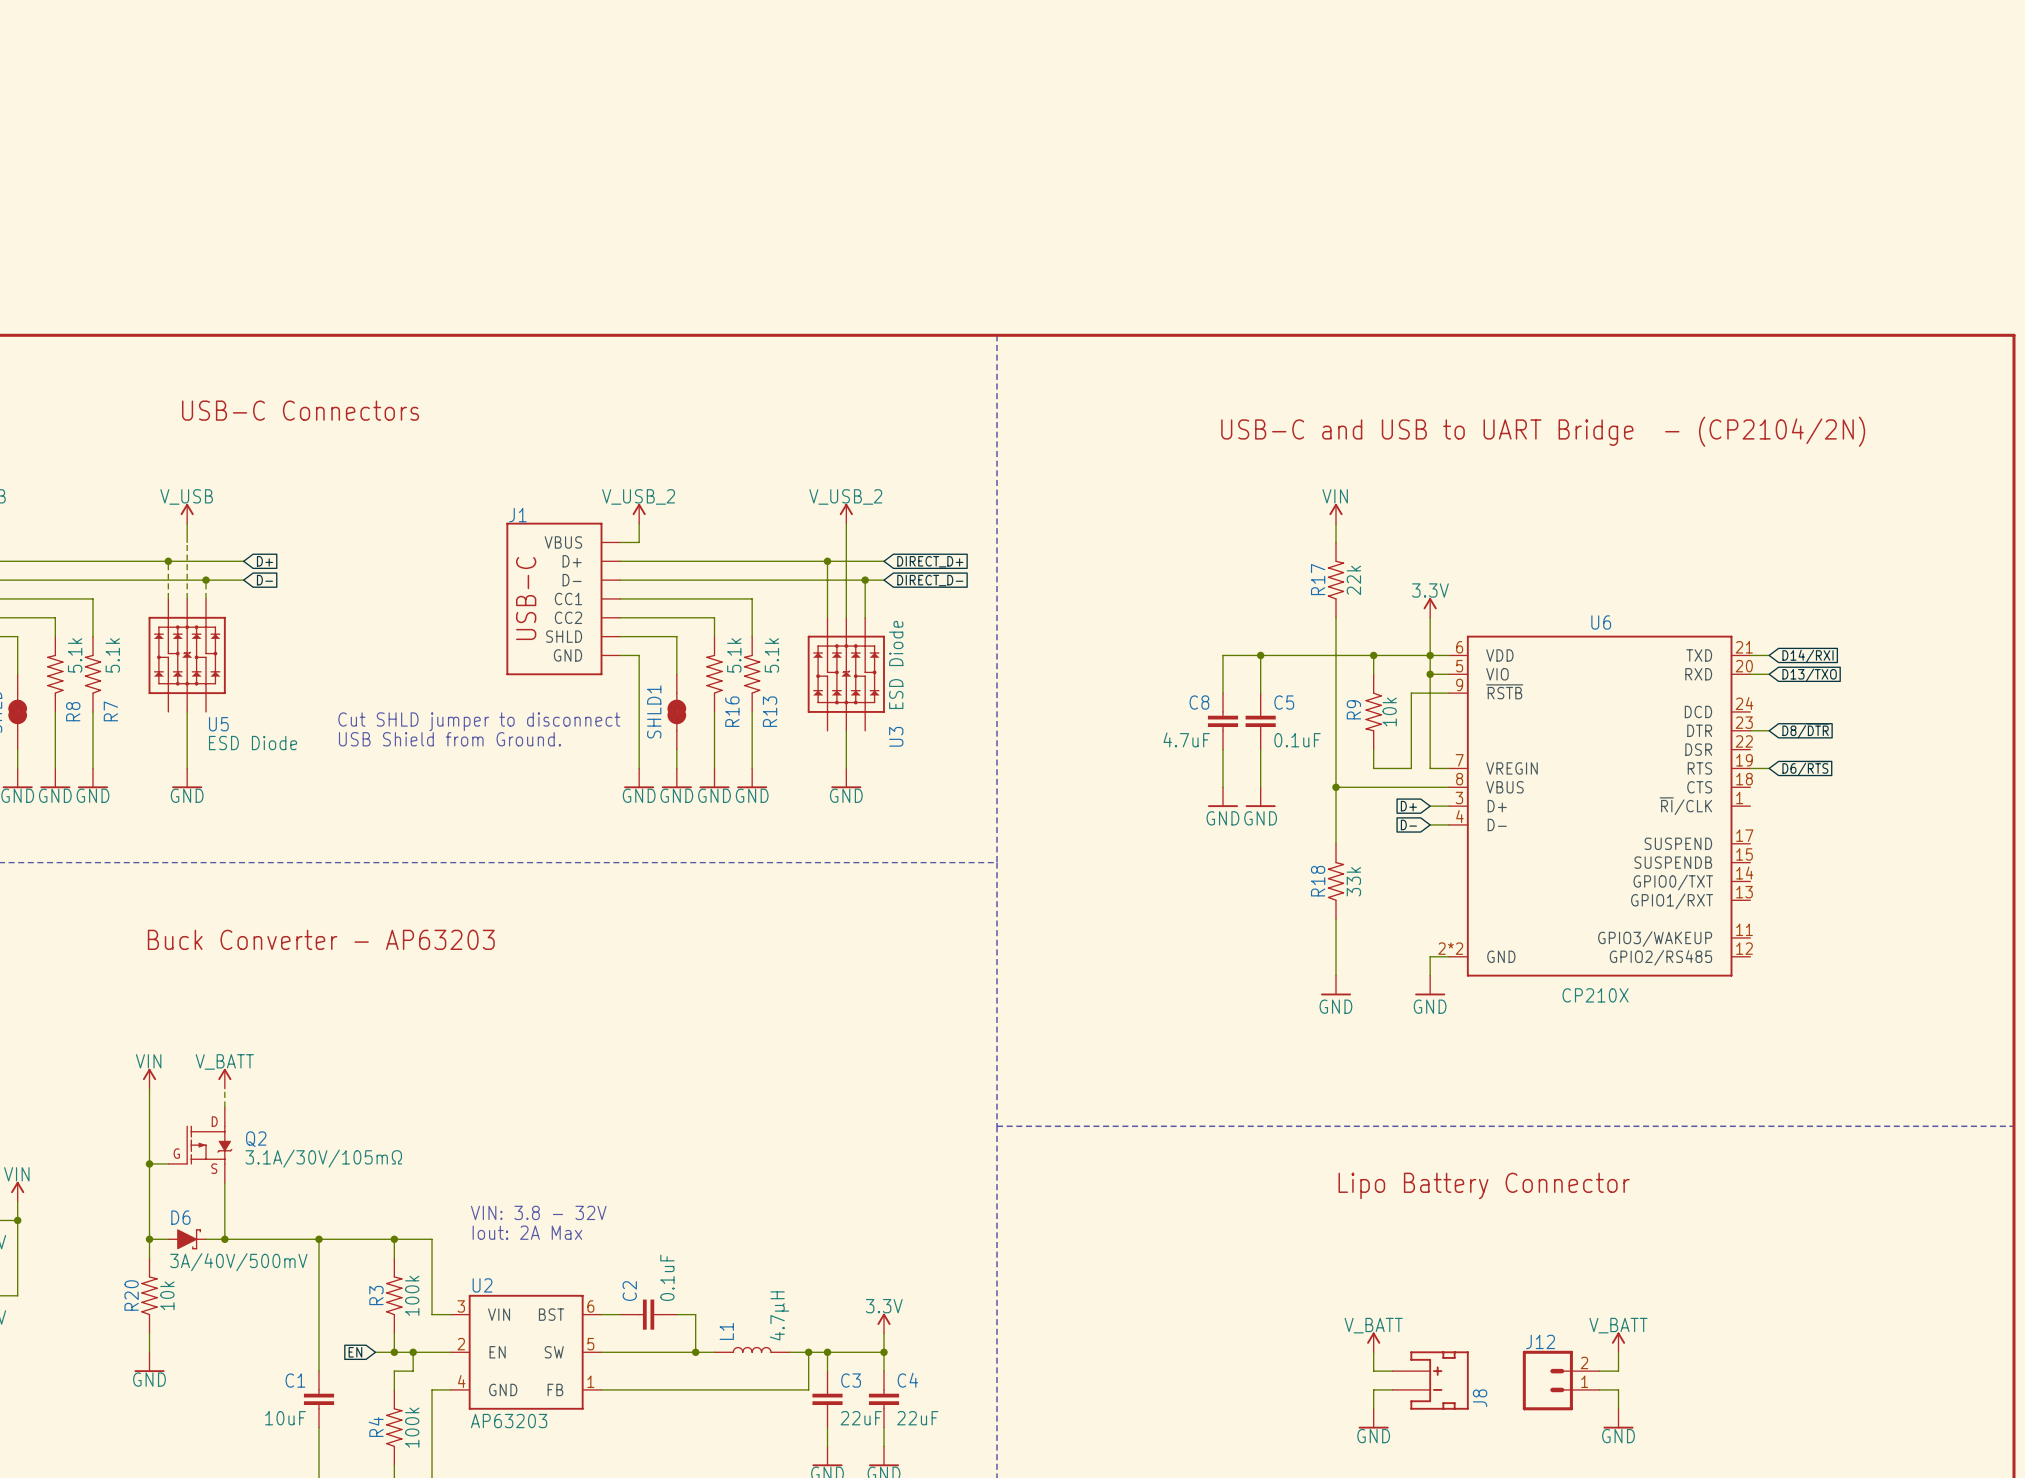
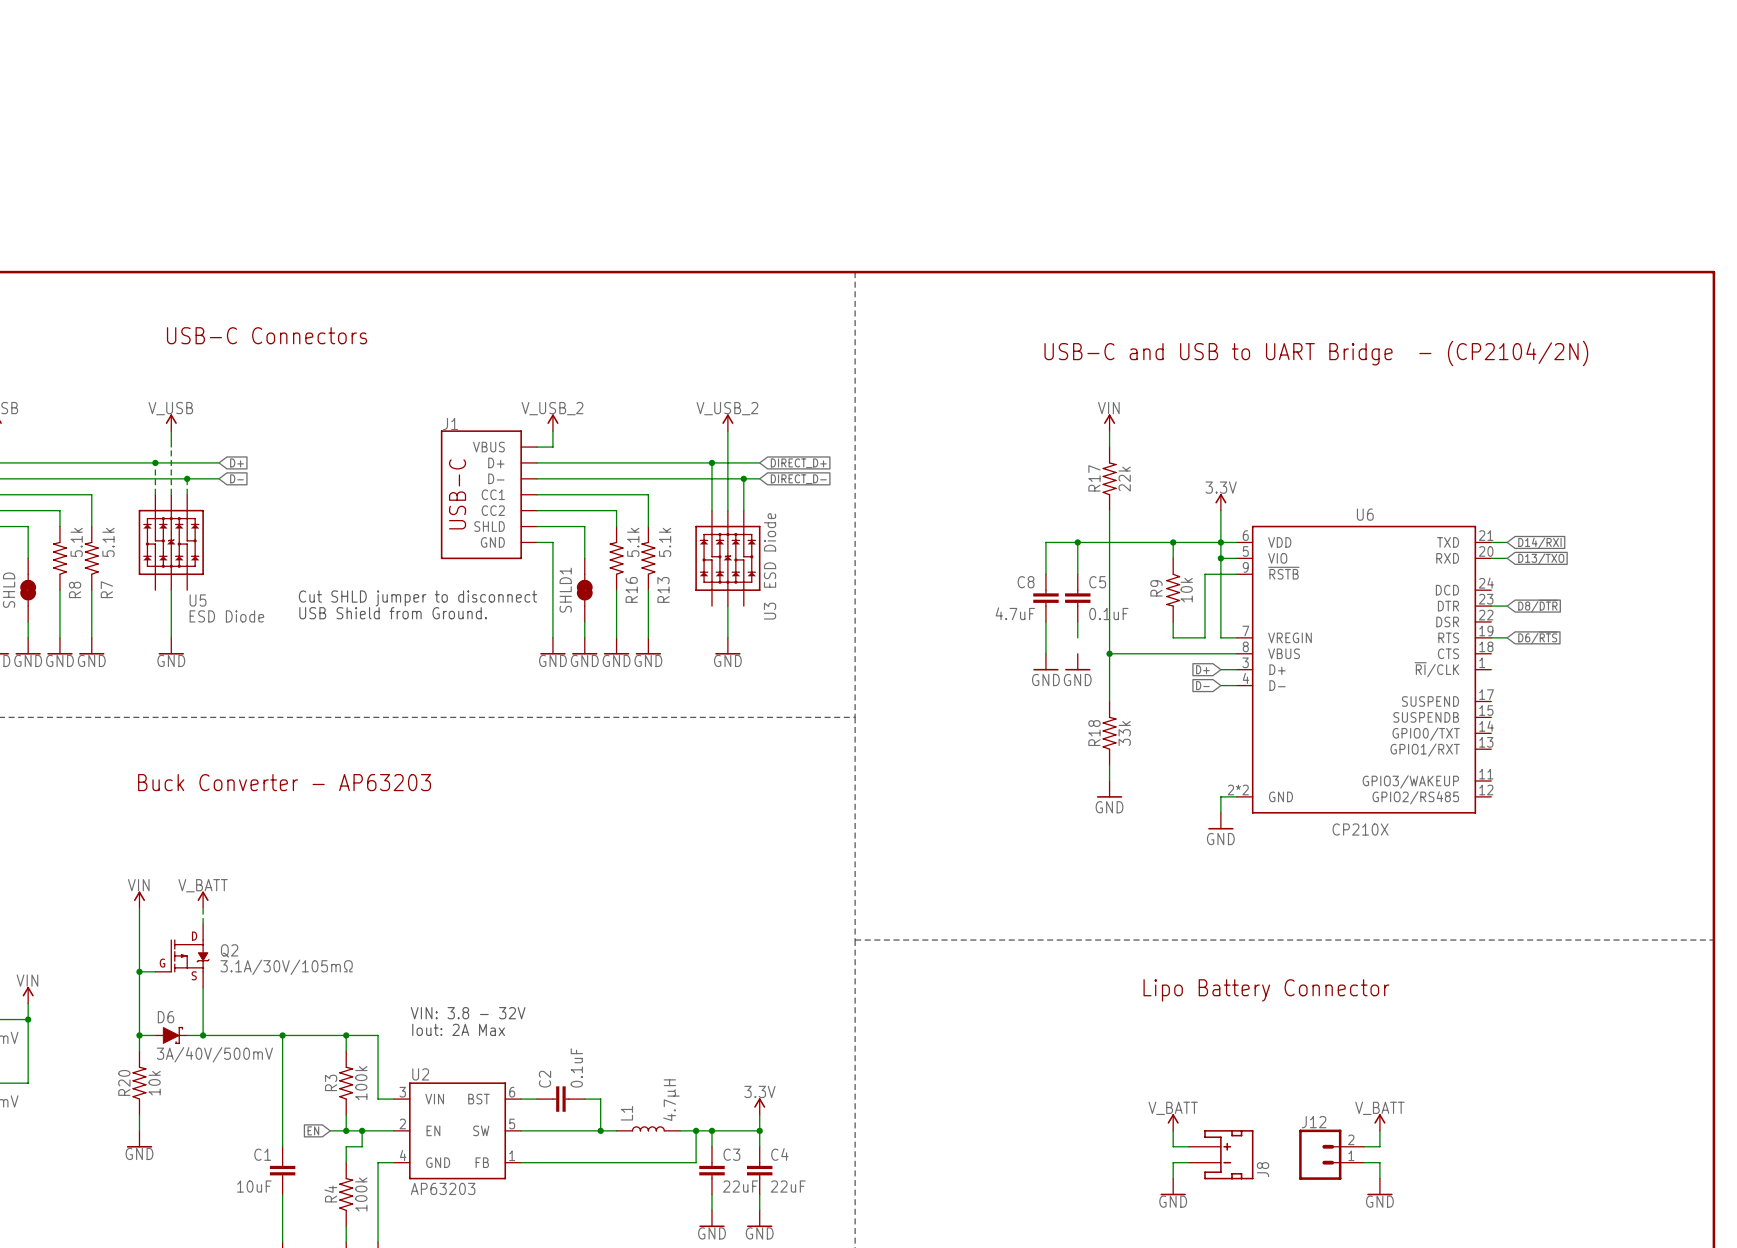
power symbol position: VIN (1336, 513) -> VIN (1109, 422)
wire: (1336, 523) (1336, 542) -> (1109, 431) (1109, 447)
R17 position: (1336, 580) -> (1109, 478)
wire: (1336, 617) (1336, 843) -> (1109, 510) (1109, 701)
wire: (1260, 768) (1260, 787) -> (1109, 765) (1109, 781)
wire: none -> (1109, 653) (1141, 653)
junction position: (1336, 787) -> (1109, 653)
R18 position: (1336, 881) -> (1109, 733)
wire: (1336, 919) (1336, 975) -> none
power symbol position: GND (1336, 985) -> GND (1109, 789)

